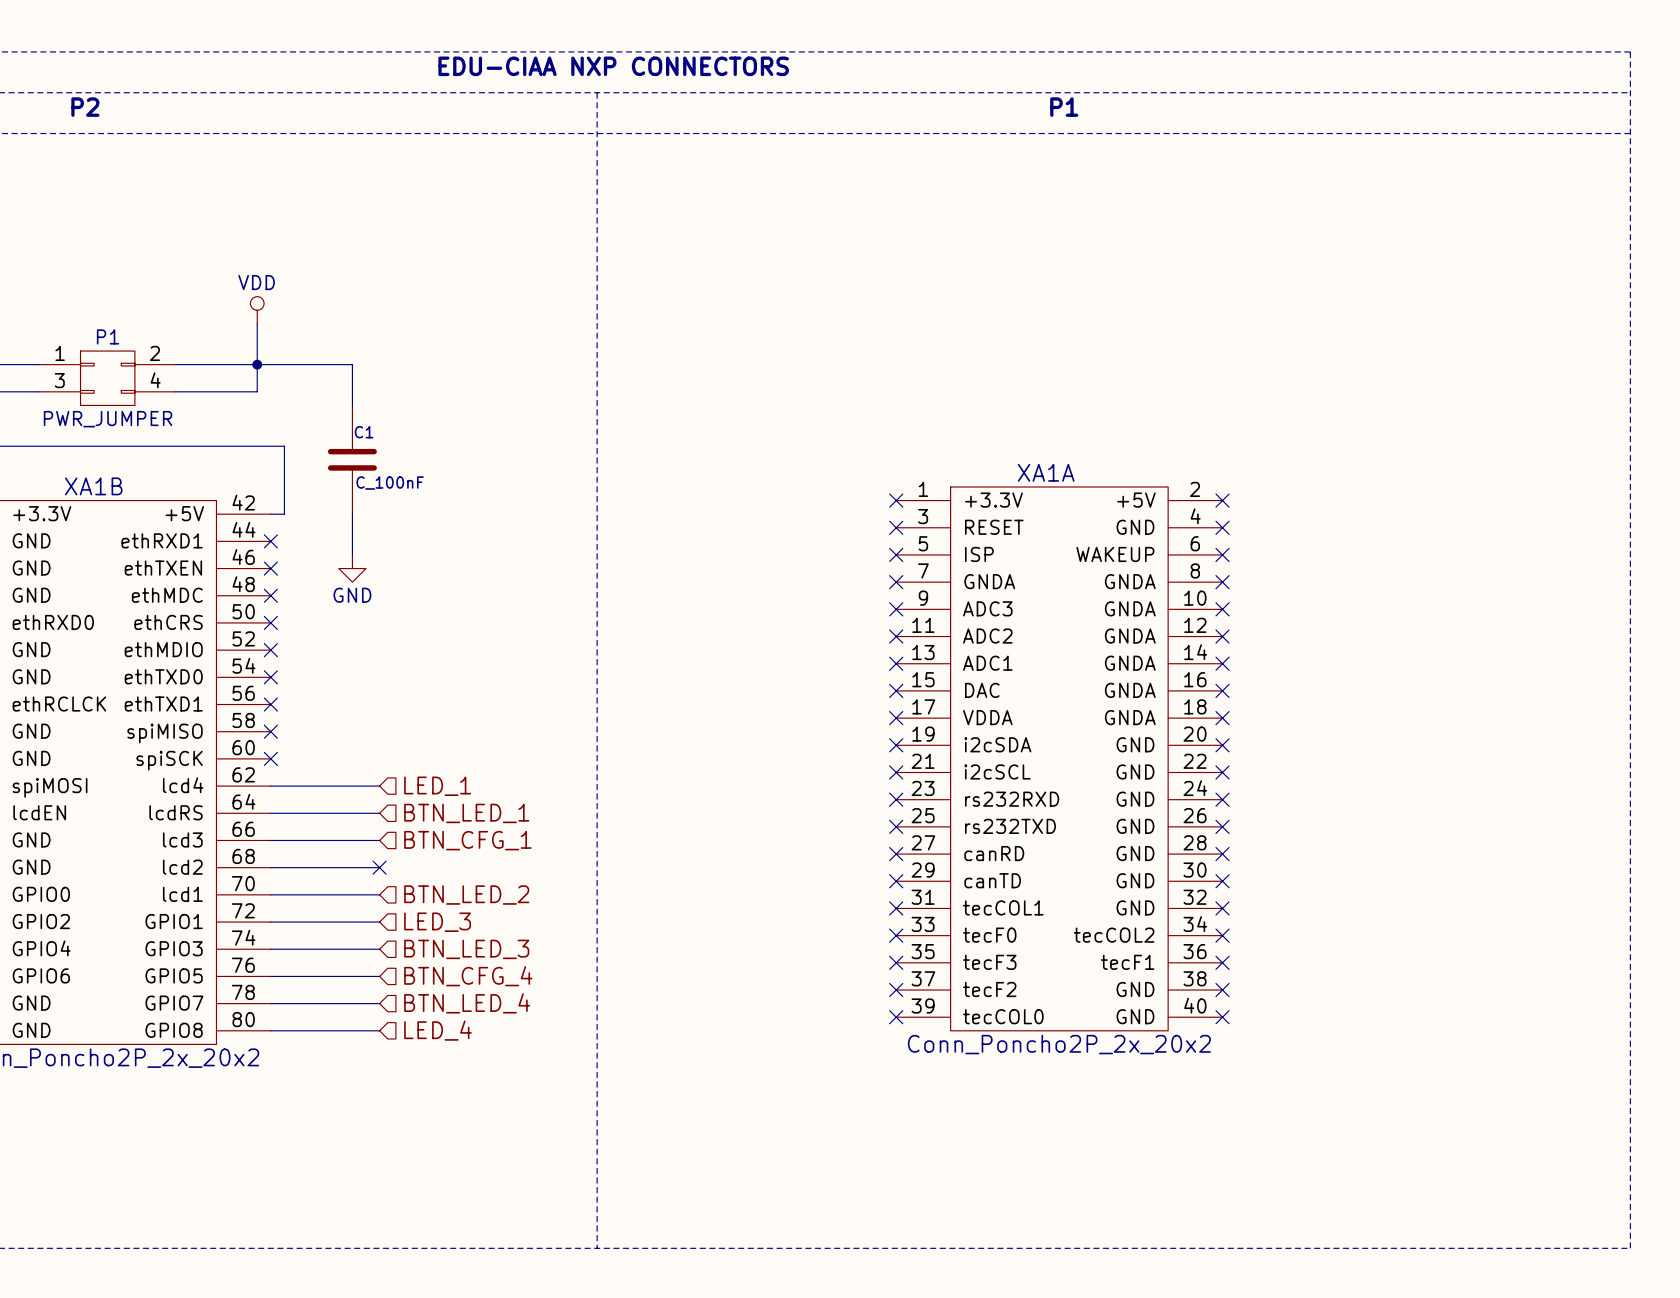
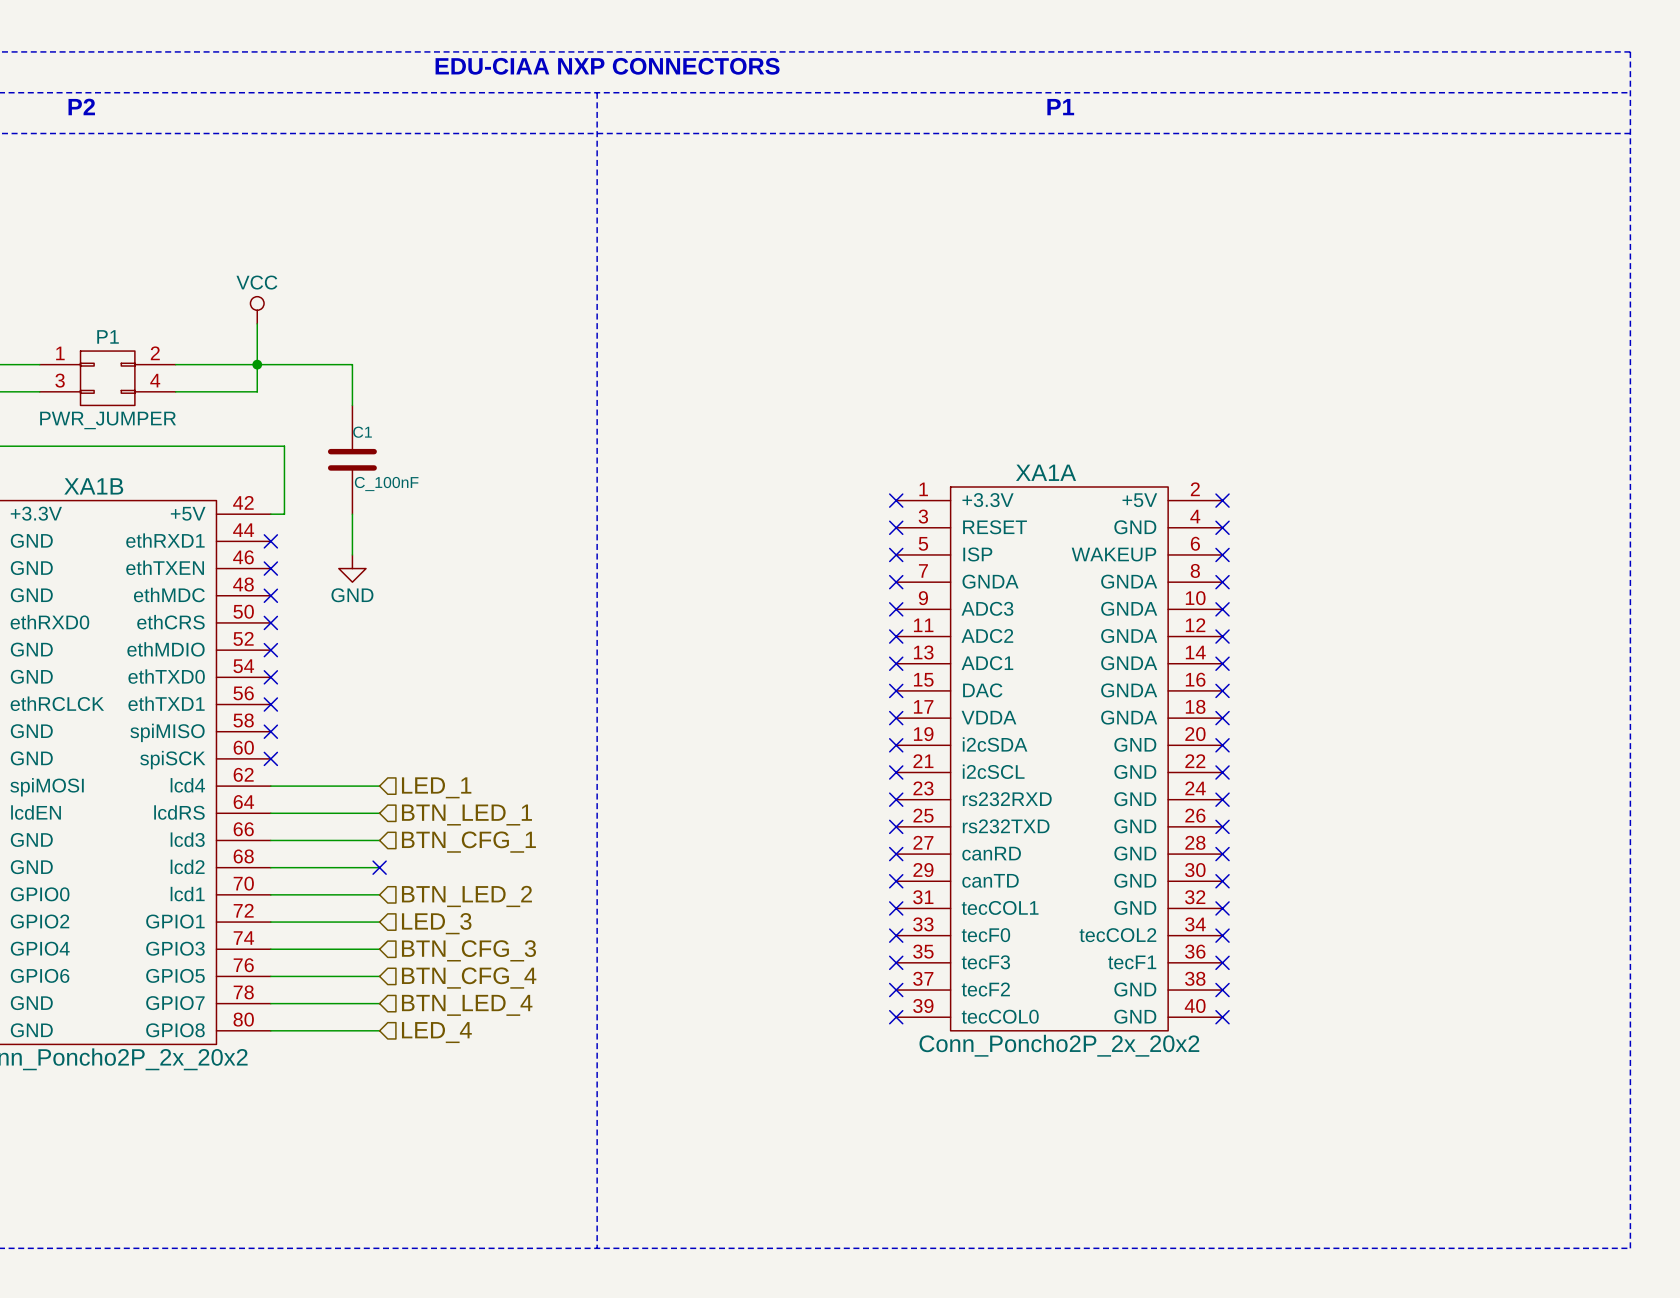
power symbol: VDD (257, 310) -> VCC (257, 310)
hierarchical label: BTN_LED_3 (466, 949) -> BTN_CFG_3 (468, 950)

